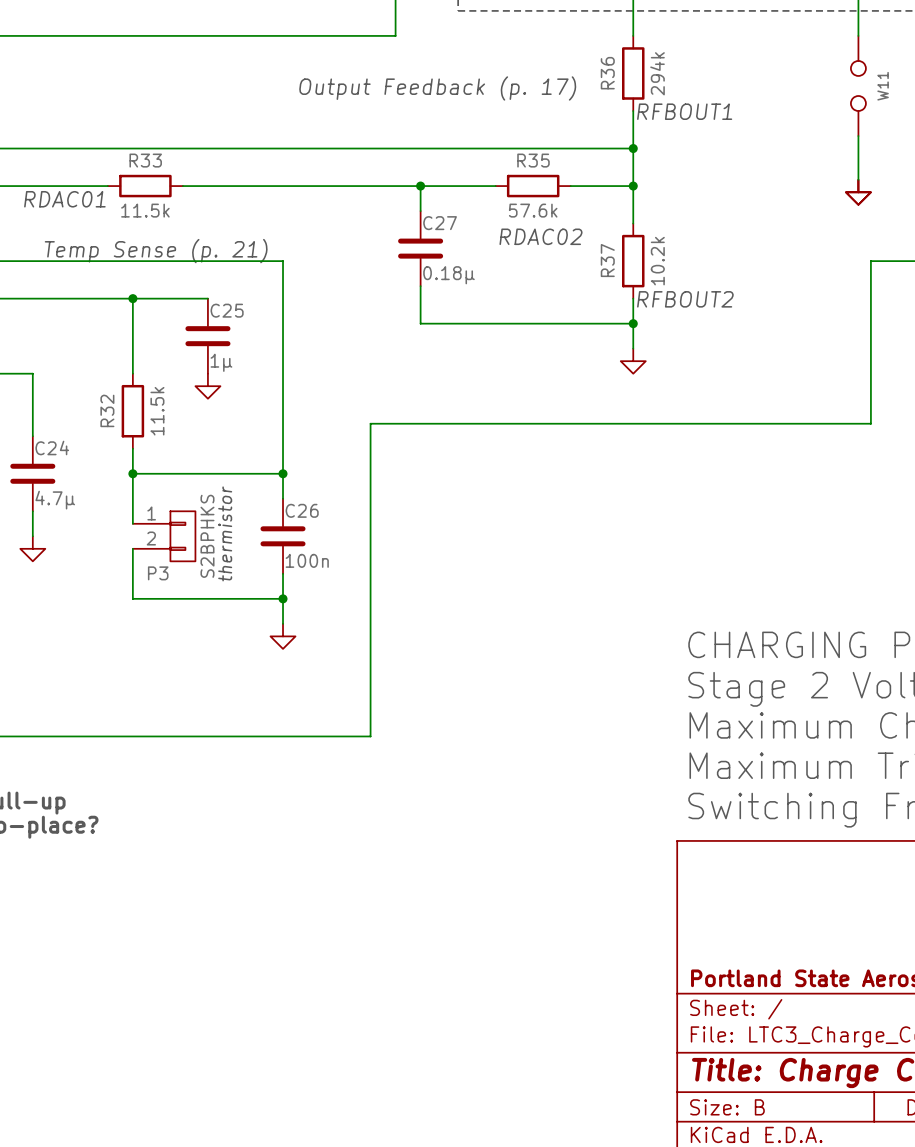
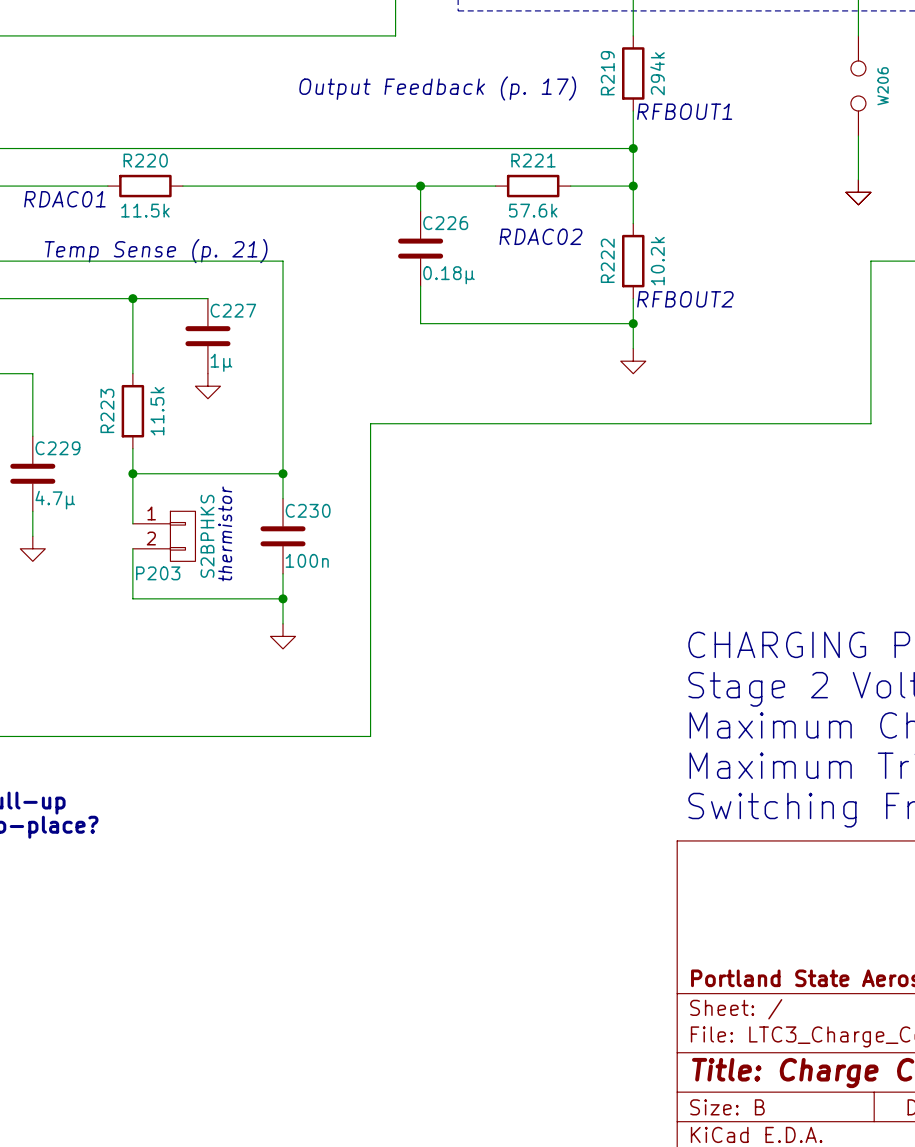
R36 name: R36 (607, 73) -> R219 (607, 73)
W11 name: W11 (883, 86) -> W206 (883, 86)
R33 name: R33 (145, 160) -> R220 (145, 160)
R35 name: R35 (533, 160) -> R221 (533, 160)
C27 name: C27 (440, 223) -> C226 (445, 223)
R37 name: R37 (607, 260) -> R222 (607, 260)
C25 name: C25 (227, 310) -> C227 (233, 310)
R32 name: R32 (107, 410) -> R223 (107, 410)
C24 name: C24 (52, 447) -> C229 (57, 448)
C26 name: C26 (302, 510) -> C230 (308, 510)
P3 name: P3 (158, 573) -> P203 (158, 573)

